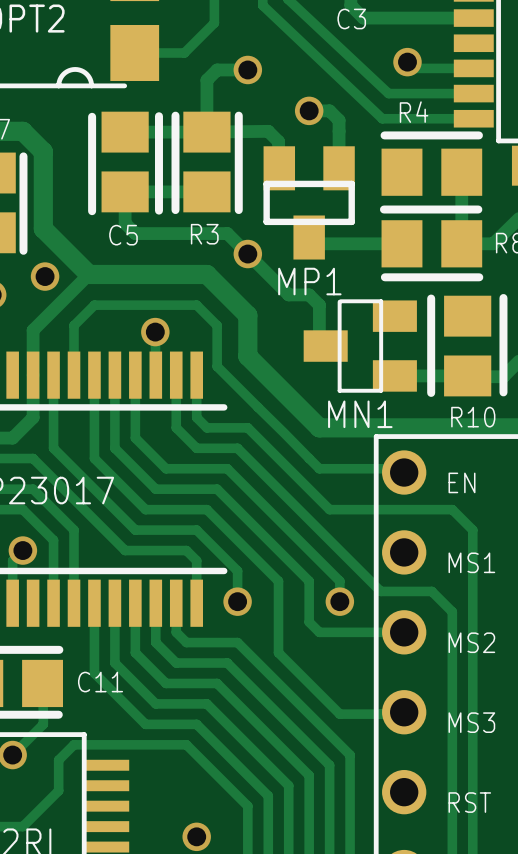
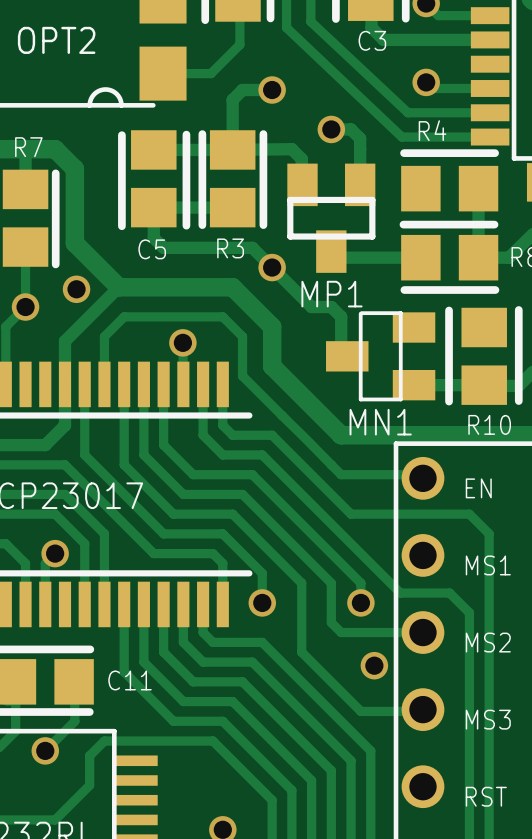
via: none -> (374, 665)

